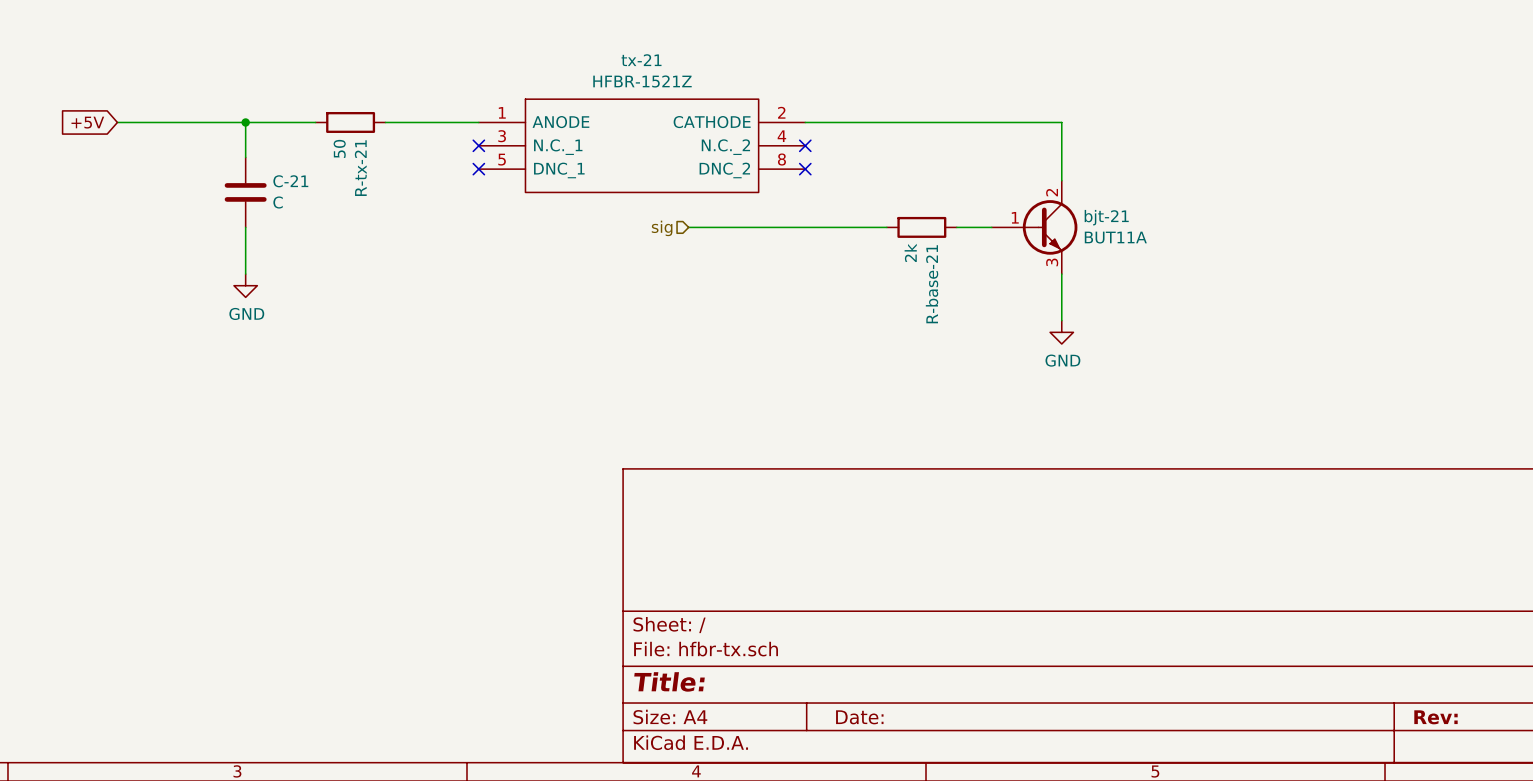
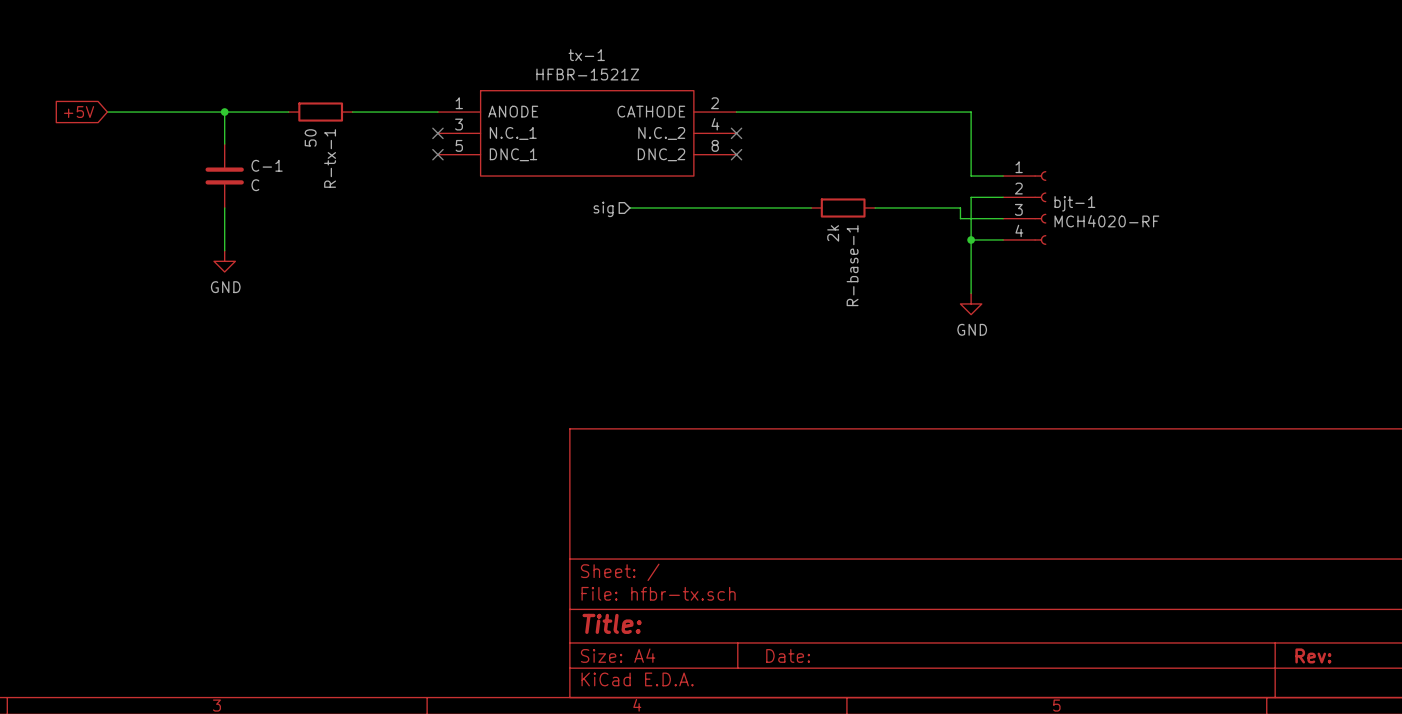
tx-21 name: tx-21 (641, 60) -> tx-1 (586, 55)
R-tx-21 name: R-tx-21 (360, 168) -> R-tx-1 (330, 158)
wire: none -> (971, 165) (971, 176) (1003, 176)
C-21 name: C-21 (290, 181) -> C-1 (267, 165)
wire: none -> (1003, 197) (971, 197) (971, 250)
wire: none -> (907, 208) (960, 208) (960, 218) (1003, 218)
bjt-21: BUT11A (1034, 227) -> none
bjt-1: none -> MCH4020-RF (1024, 208)
wire: none -> (971, 239) (1003, 239)
junction: none -> (971, 239)
R-base-21 name: R-base-21 (932, 284) -> R-base-1 (852, 265)

